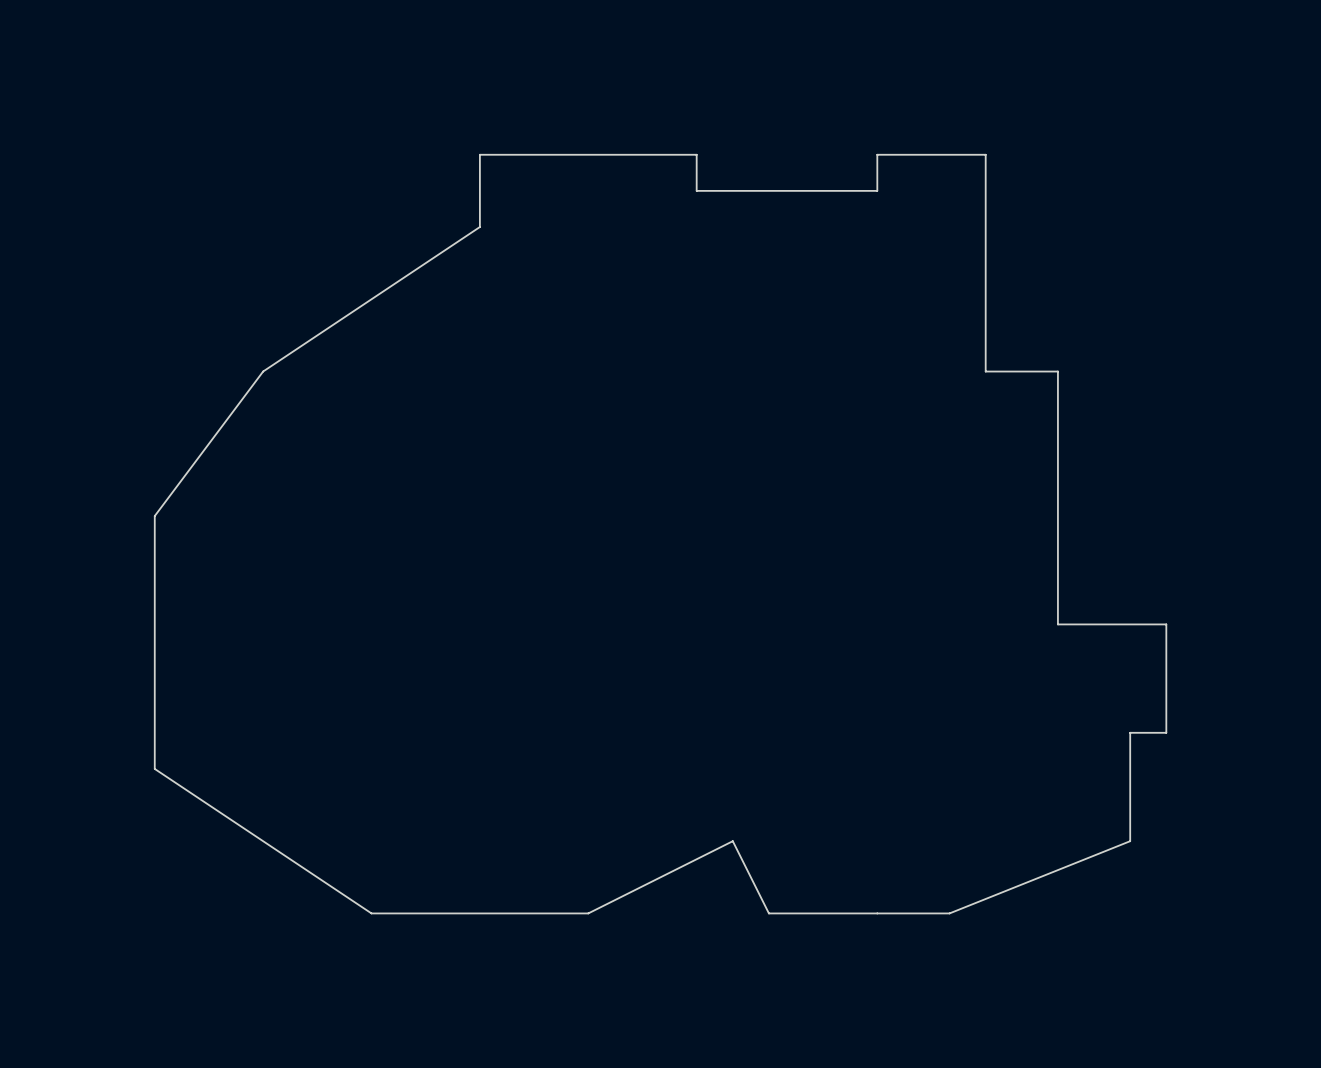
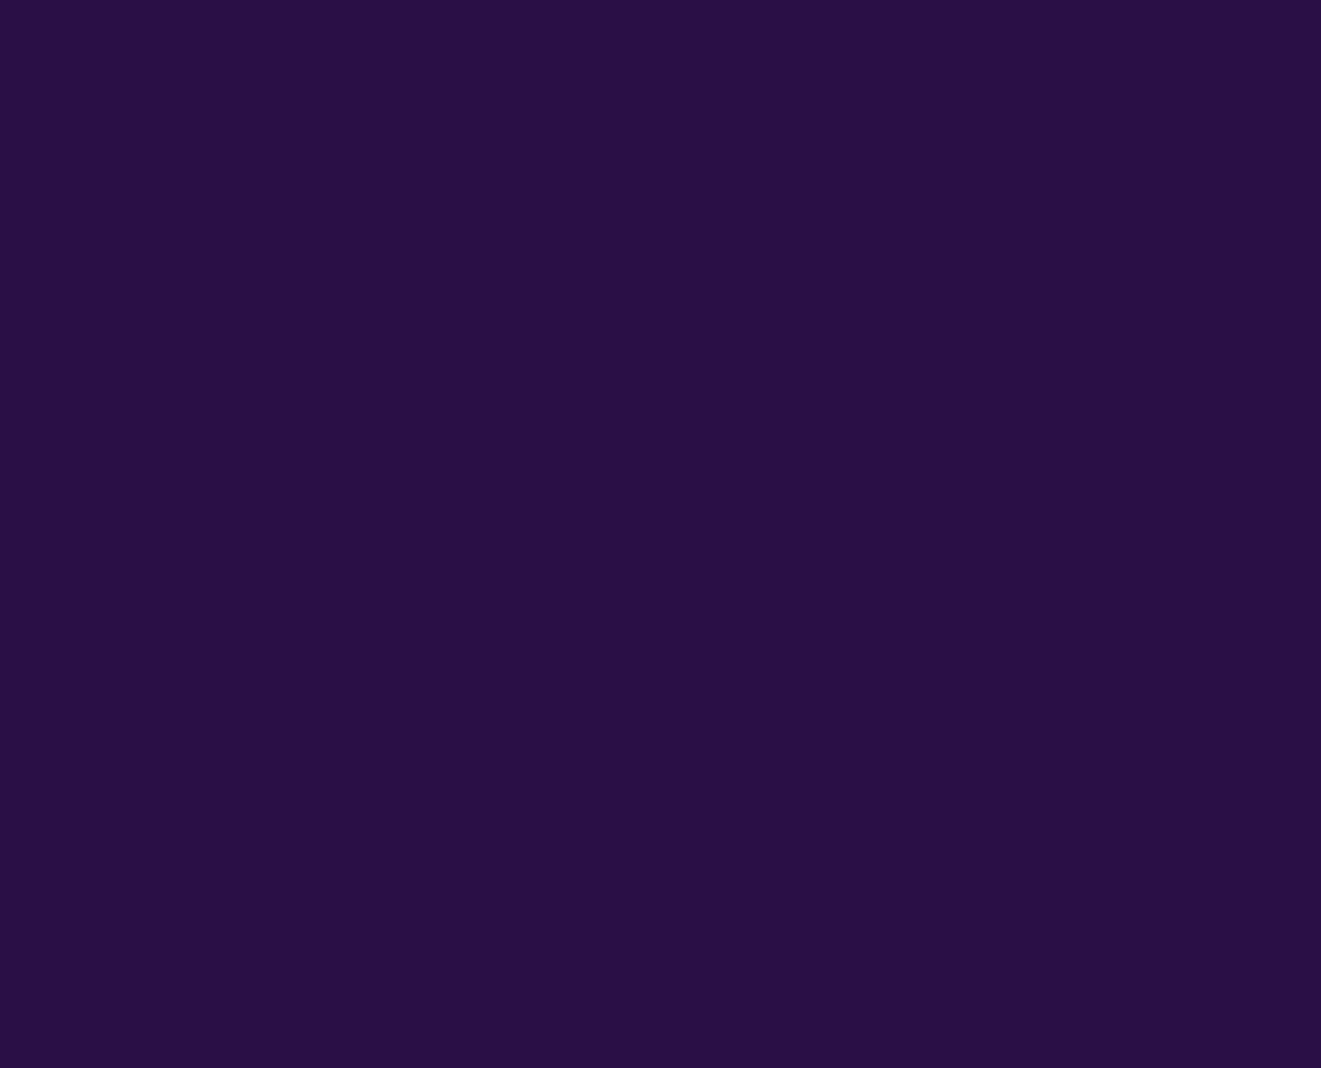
board edge: (985, 154) (985, 371) (1057, 371) (1057, 624) (1166, 624) (1166, 732) (1130, 732) (1130, 841) (949, 913) (768, 913) (732, 841) (588, 913) (371, 913) (154, 768) (154, 516) (263, 371) (479, 227) (479, 154) (696, 154) (696, 190) (877, 190) (877, 154) (985, 154) -> none

